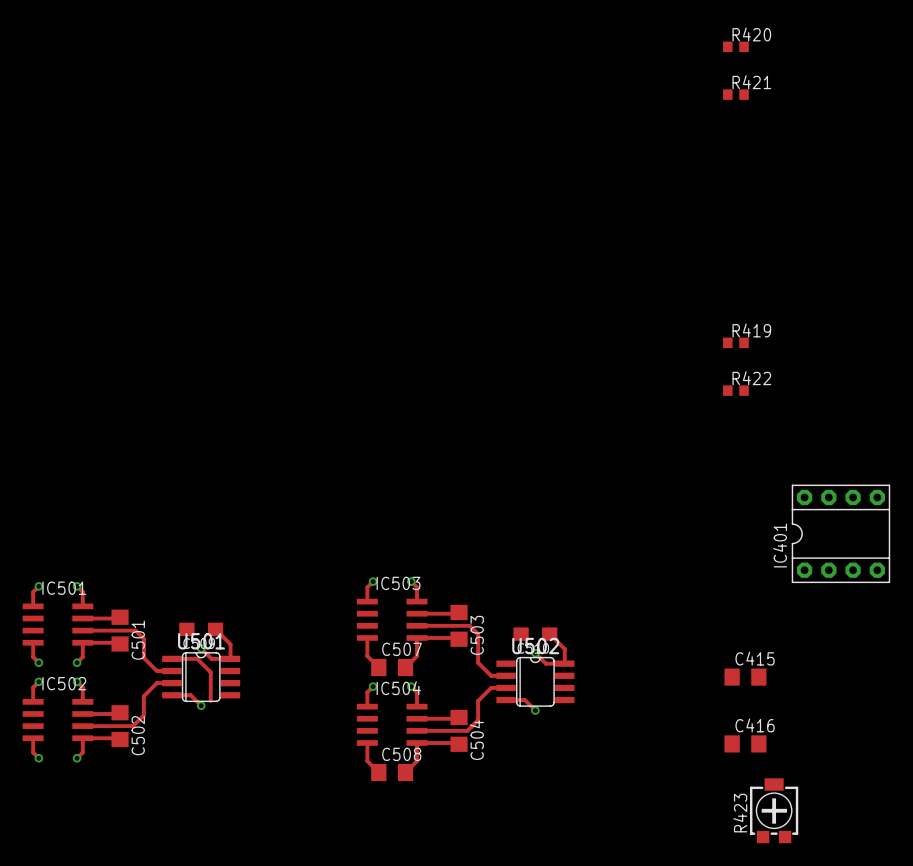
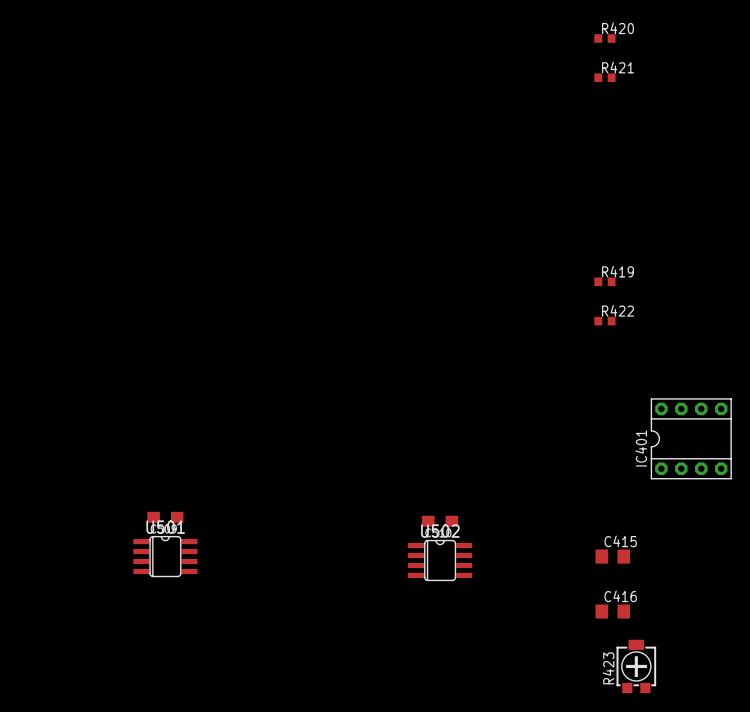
track: (373, 581) (367, 587) (367, 601) -> none
via: (373, 581) -> none
track: (411, 581) (417, 587) (417, 601) -> none
via: (411, 581) -> none
track: (38, 586) (33, 592) (33, 606) -> none
via: (38, 586) -> none
track: (77, 586) (82, 592) (82, 606) -> none
via: (77, 586) -> none
track: (459, 612) (417, 613) -> none
track: (120, 617) (82, 618) -> none
IC503: (392, 619) -> none
IC501: (57, 624) -> none
track: (417, 625) (469, 625) (478, 634) (478, 662) (491, 675) (506, 675) -> none
C503: (459, 625) -> none
track: (215, 629) (230, 644) (230, 658) (211, 658) (201, 648) -> none
track: (82, 630) (135, 630) (143, 638) (143, 657) (156, 671) (171, 671) -> none
C501: (120, 630) -> none
track: (549, 634) (564, 649) (564, 663) (545, 663) (535, 653) -> none
track: (367, 637) (367, 656) (378, 667) -> none
track: (459, 639) (417, 637) (417, 656) (405, 667) -> none
track: (33, 642) (33, 657) (38, 662) -> none
track: (120, 643) (82, 642) (82, 657) (77, 662) -> none
via: (201, 648) -> none
via: (535, 653) -> none
track: (171, 658) (197, 658) (210, 672) (210, 700) -> none
via: (38, 662) -> none
via: (77, 662) -> none
C507: (392, 667) -> none
track: (38, 681) (33, 687) (33, 701) -> none
via: (38, 681) -> none
track: (77, 681) (82, 687) (82, 701) -> none
via: (77, 681) -> none
track: (171, 683) (156, 683) (143, 696) (143, 715) (133, 726) (82, 726) -> none
track: (373, 686) (367, 692) (367, 706) -> none
via: (373, 686) -> none
track: (411, 686) (417, 692) (417, 706) -> none
via: (411, 686) -> none
track: (506, 687) (491, 687) (478, 700) (478, 720) (471, 726) -> none
track: (171, 695) (190, 695) (201, 705) -> none
track: (506, 700) (524, 700) (535, 710) -> none
via: (201, 705) -> none
via: (535, 710) -> none
track: (120, 712) (82, 713) -> none
track: (459, 717) (417, 718) -> none
IC502: (57, 720) -> none
IC504: (392, 724) -> none
C502: (120, 726) -> none
track: (471, 726) (467, 730) (417, 730) -> none
C504: (459, 730) -> none
track: (33, 738) (33, 752) (38, 758) -> none
track: (120, 739) (82, 738) (82, 752) (77, 758) -> none
track: (367, 743) (367, 761) (378, 772) -> none
track: (459, 744) (417, 743) (417, 761) (405, 772) -> none
via: (38, 758) -> none
via: (77, 758) -> none
C508: (392, 772) -> none

